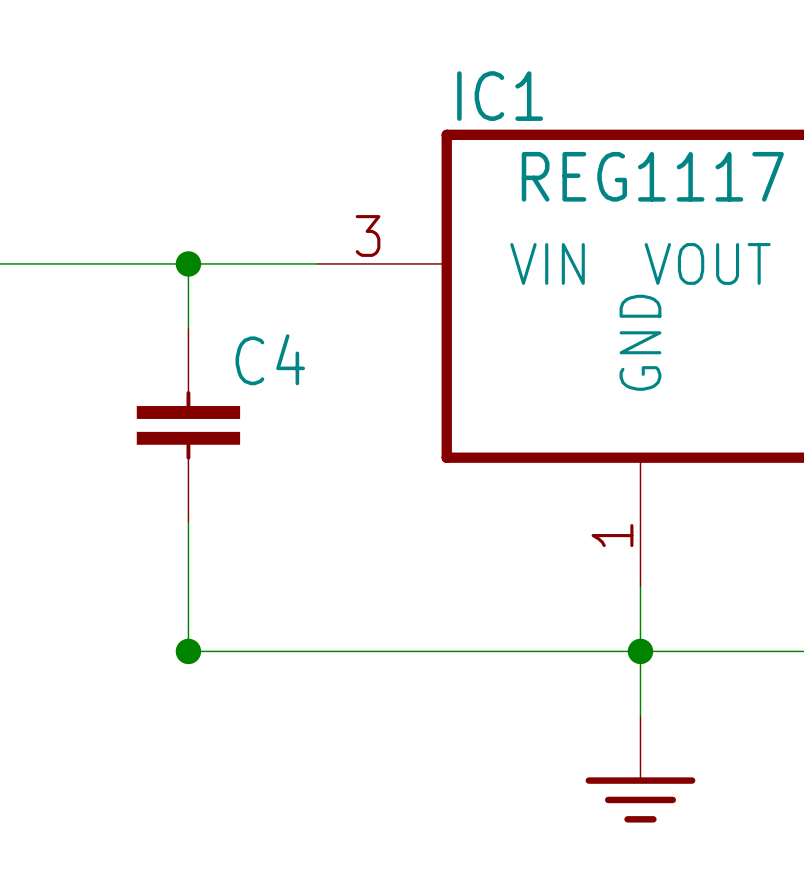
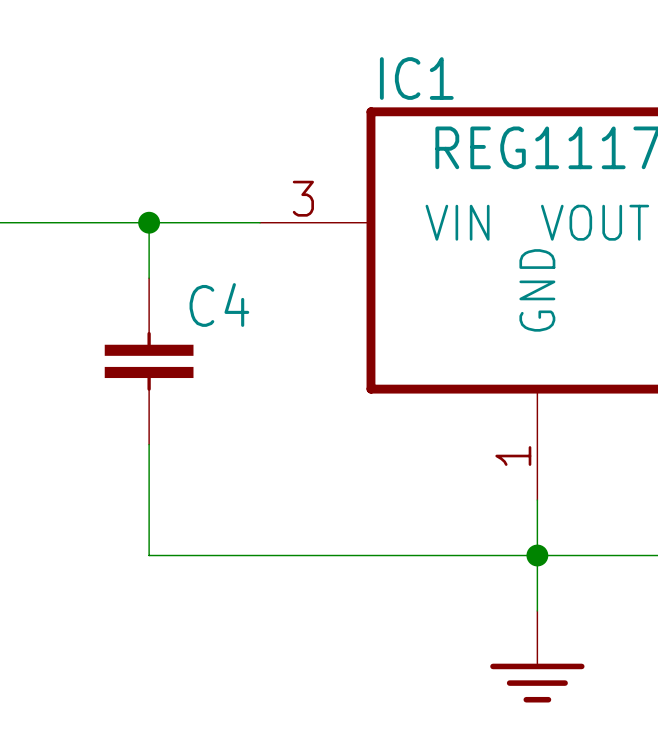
junction: (188, 651) -> none

